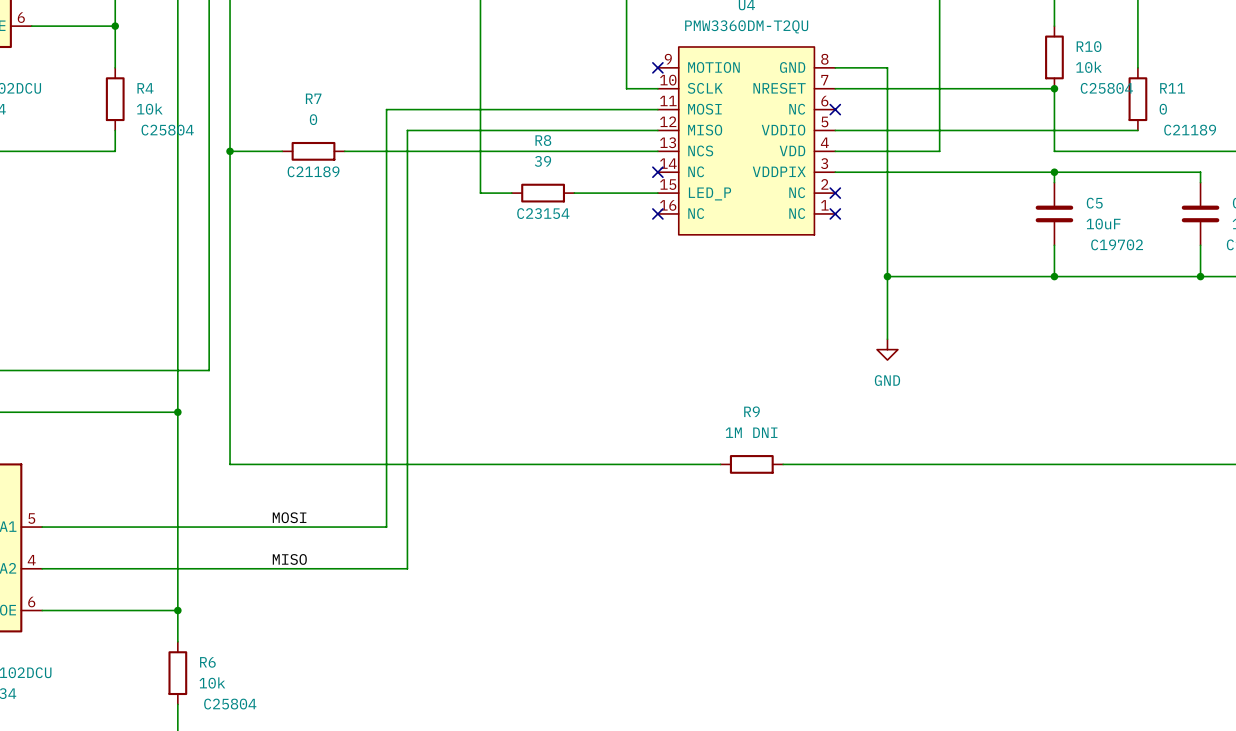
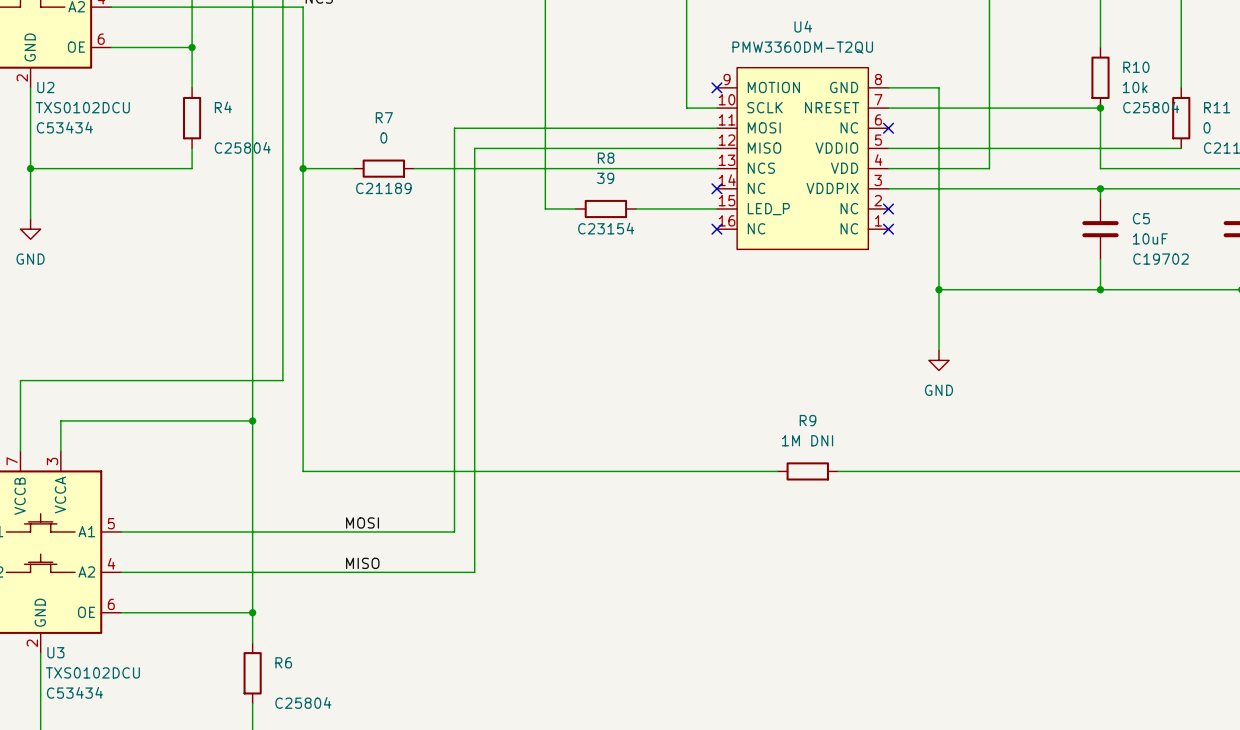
R4 value: 10k (149, 108) -> none
R6 value: 10k (212, 682) -> none

